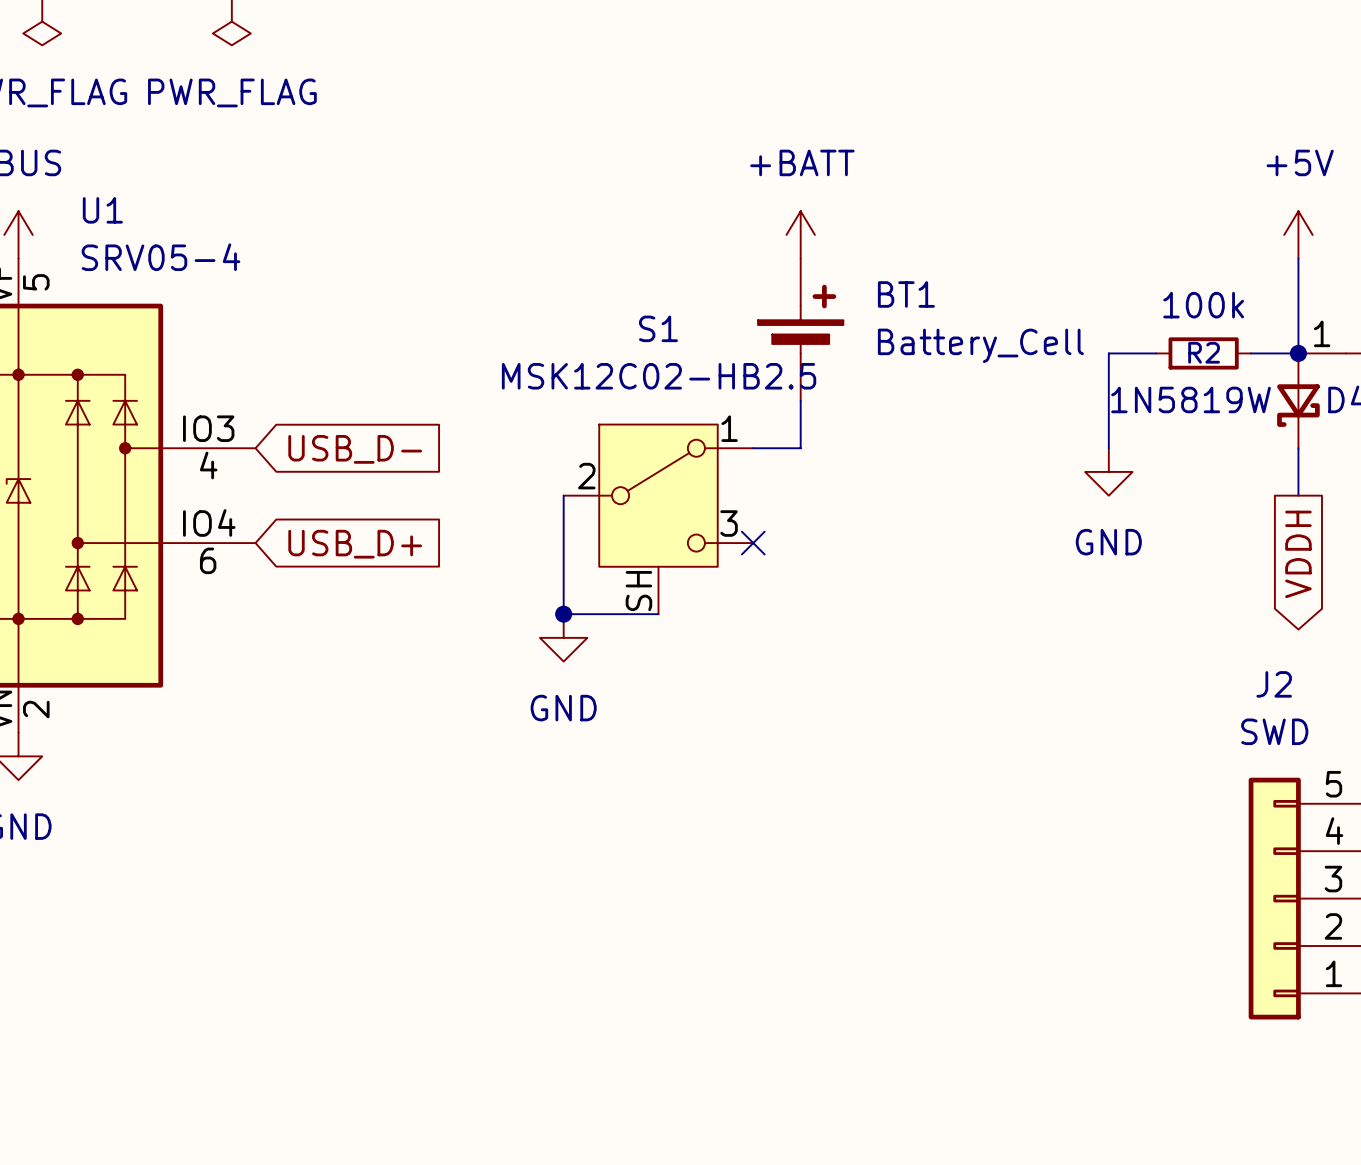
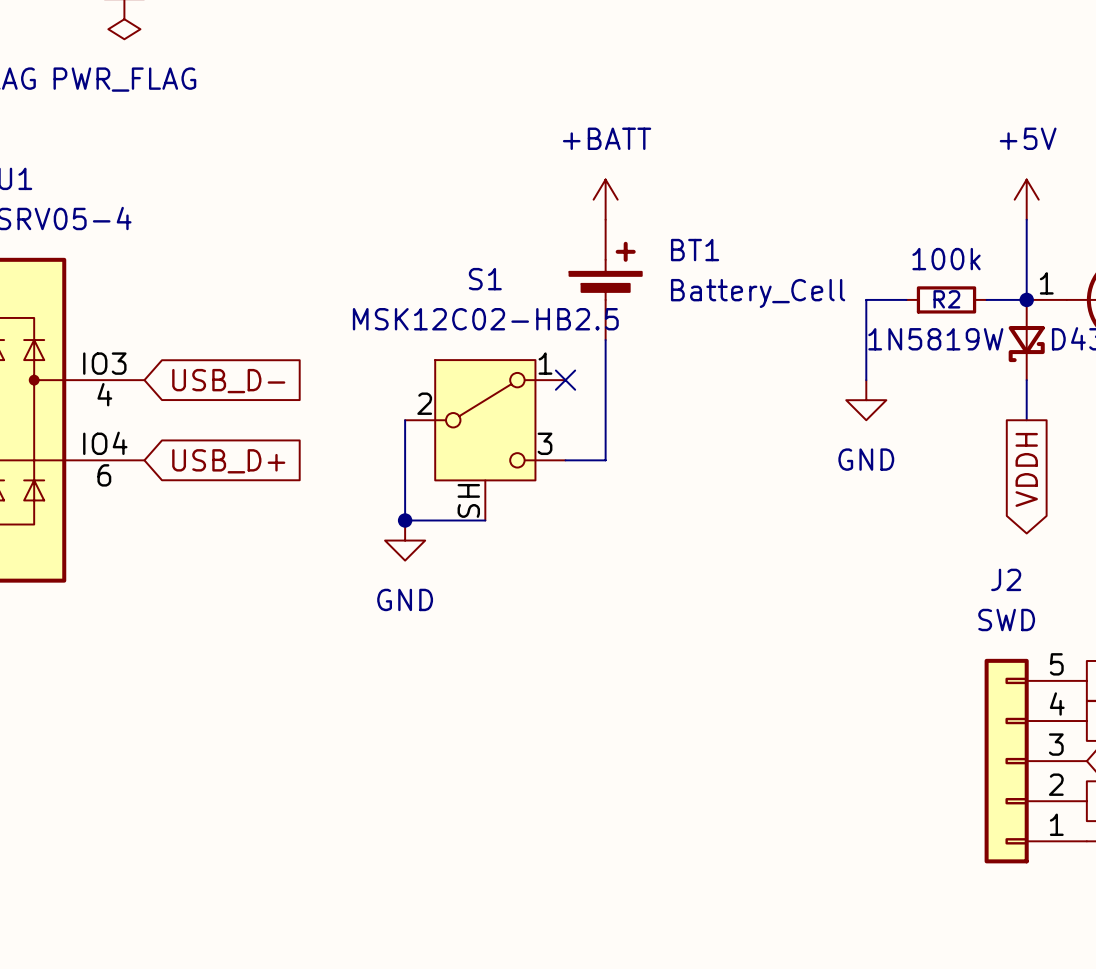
wire: (753, 448) (800, 448) -> (565, 460) (605, 460) (605, 380)
no-connect mark position: (753, 543) -> (565, 380)

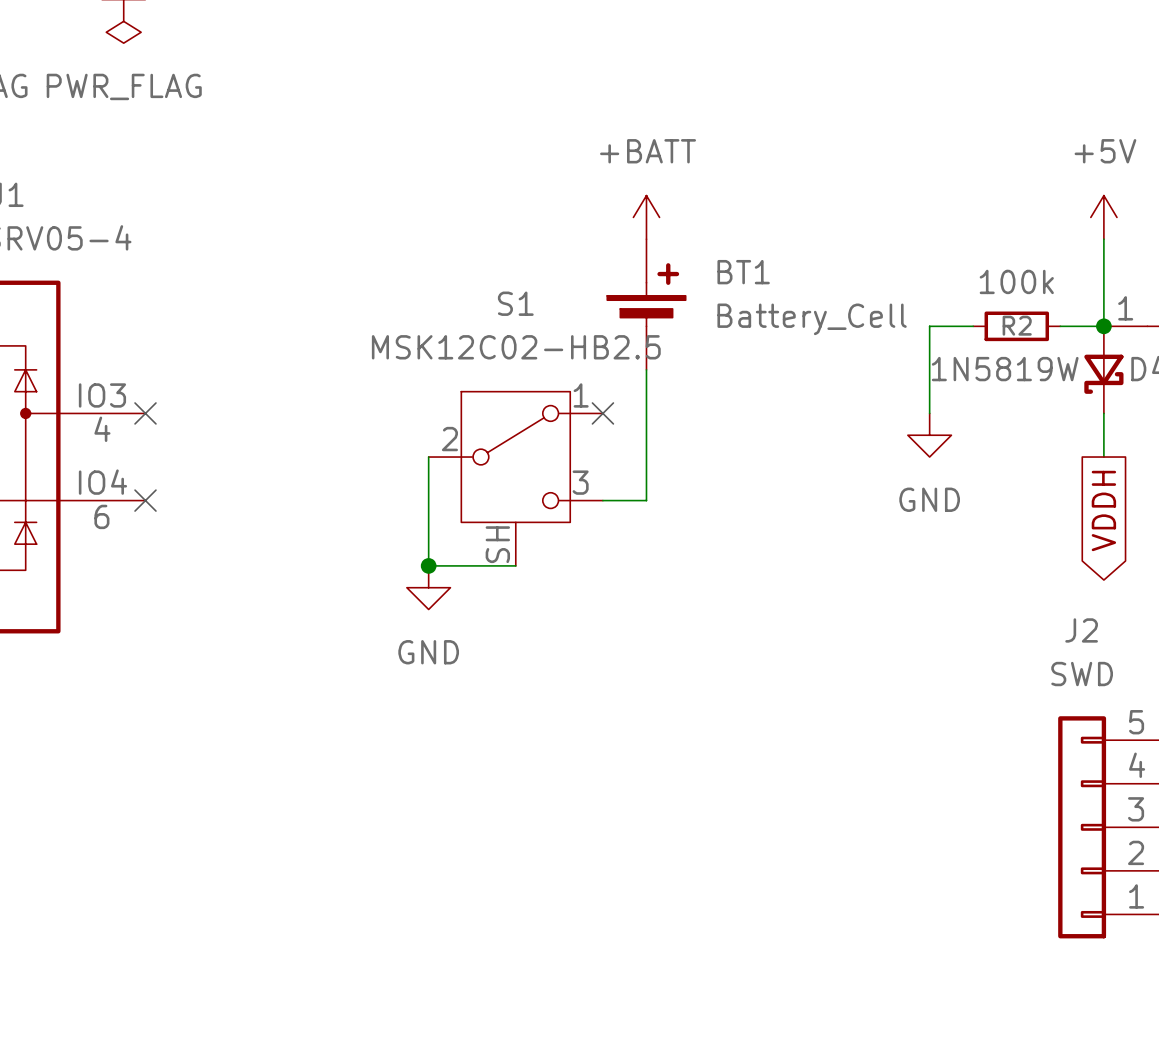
no-connect mark: none -> (145, 413)
global label: USB_D- (228, 381) -> none
no-connect mark: none -> (145, 500)
global label: USB_D+ (228, 461) -> none

